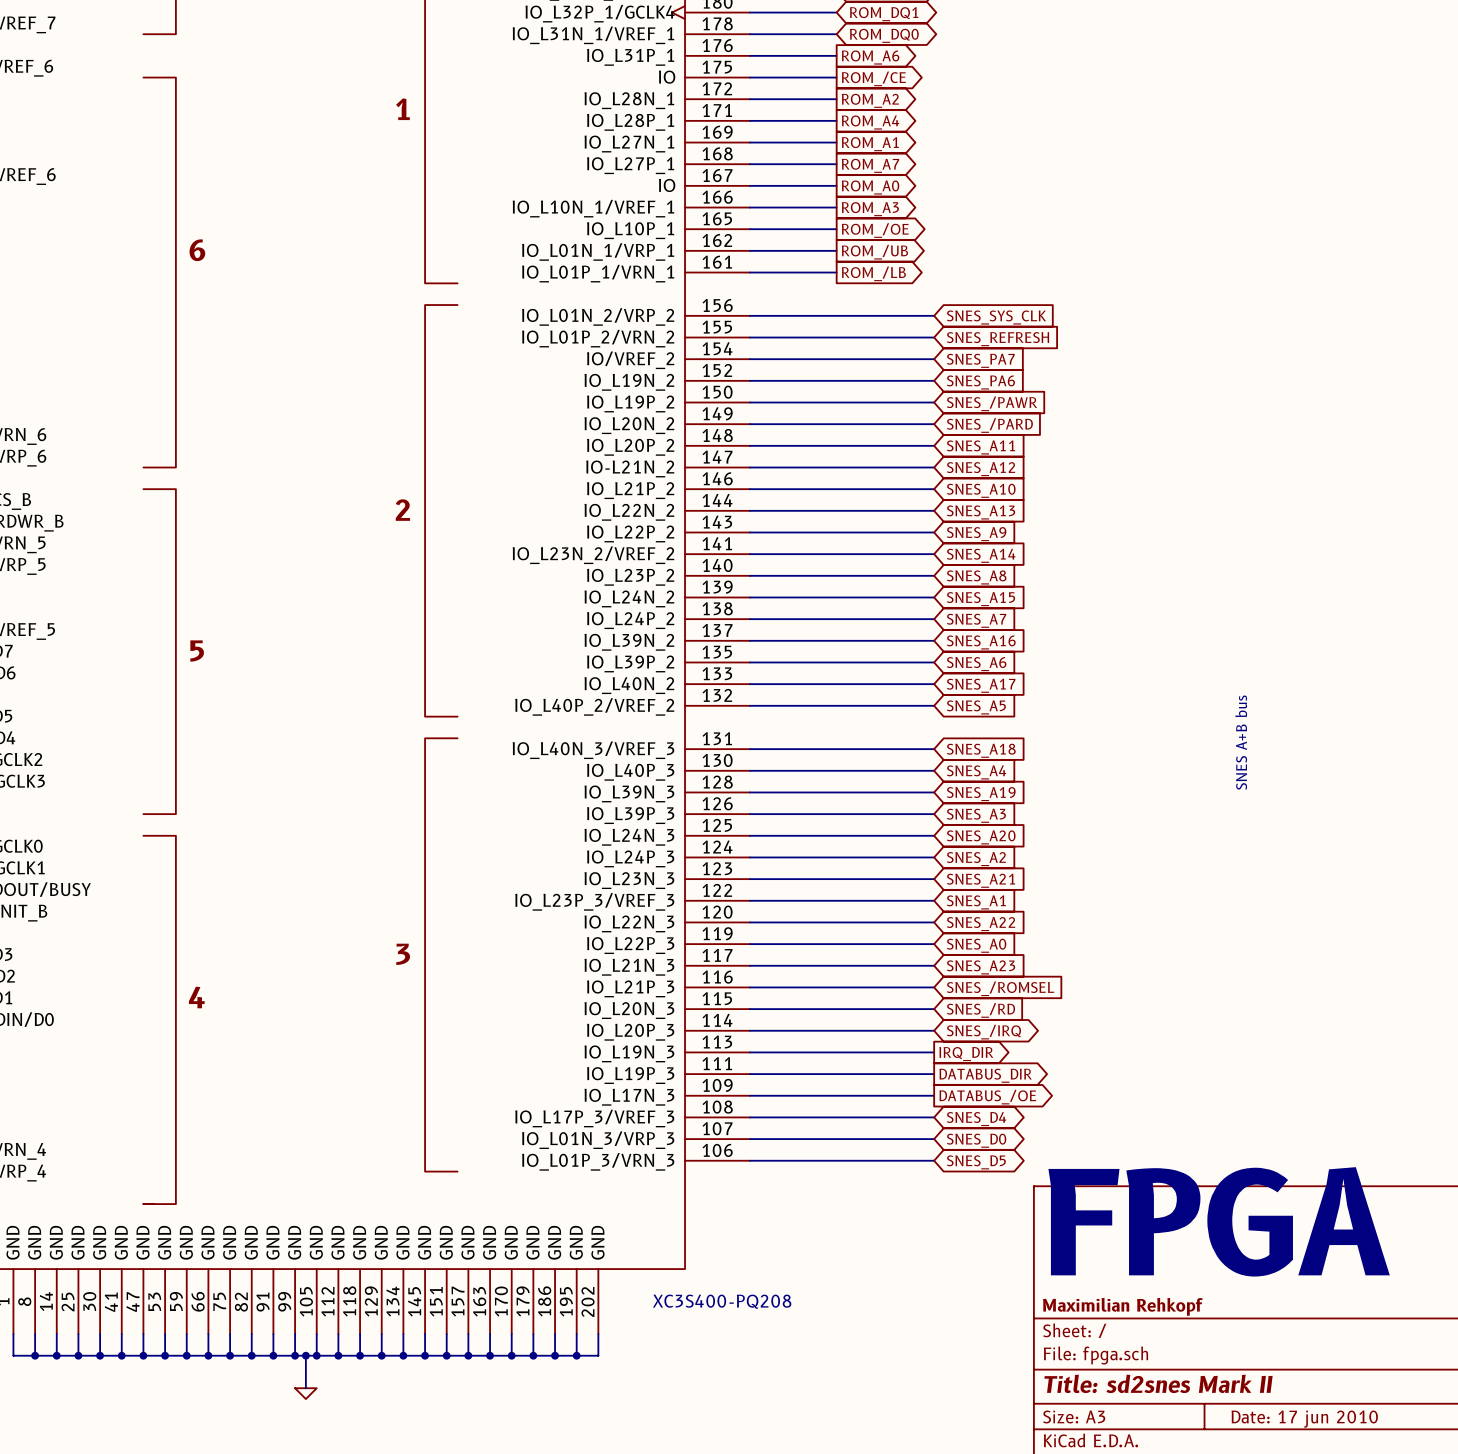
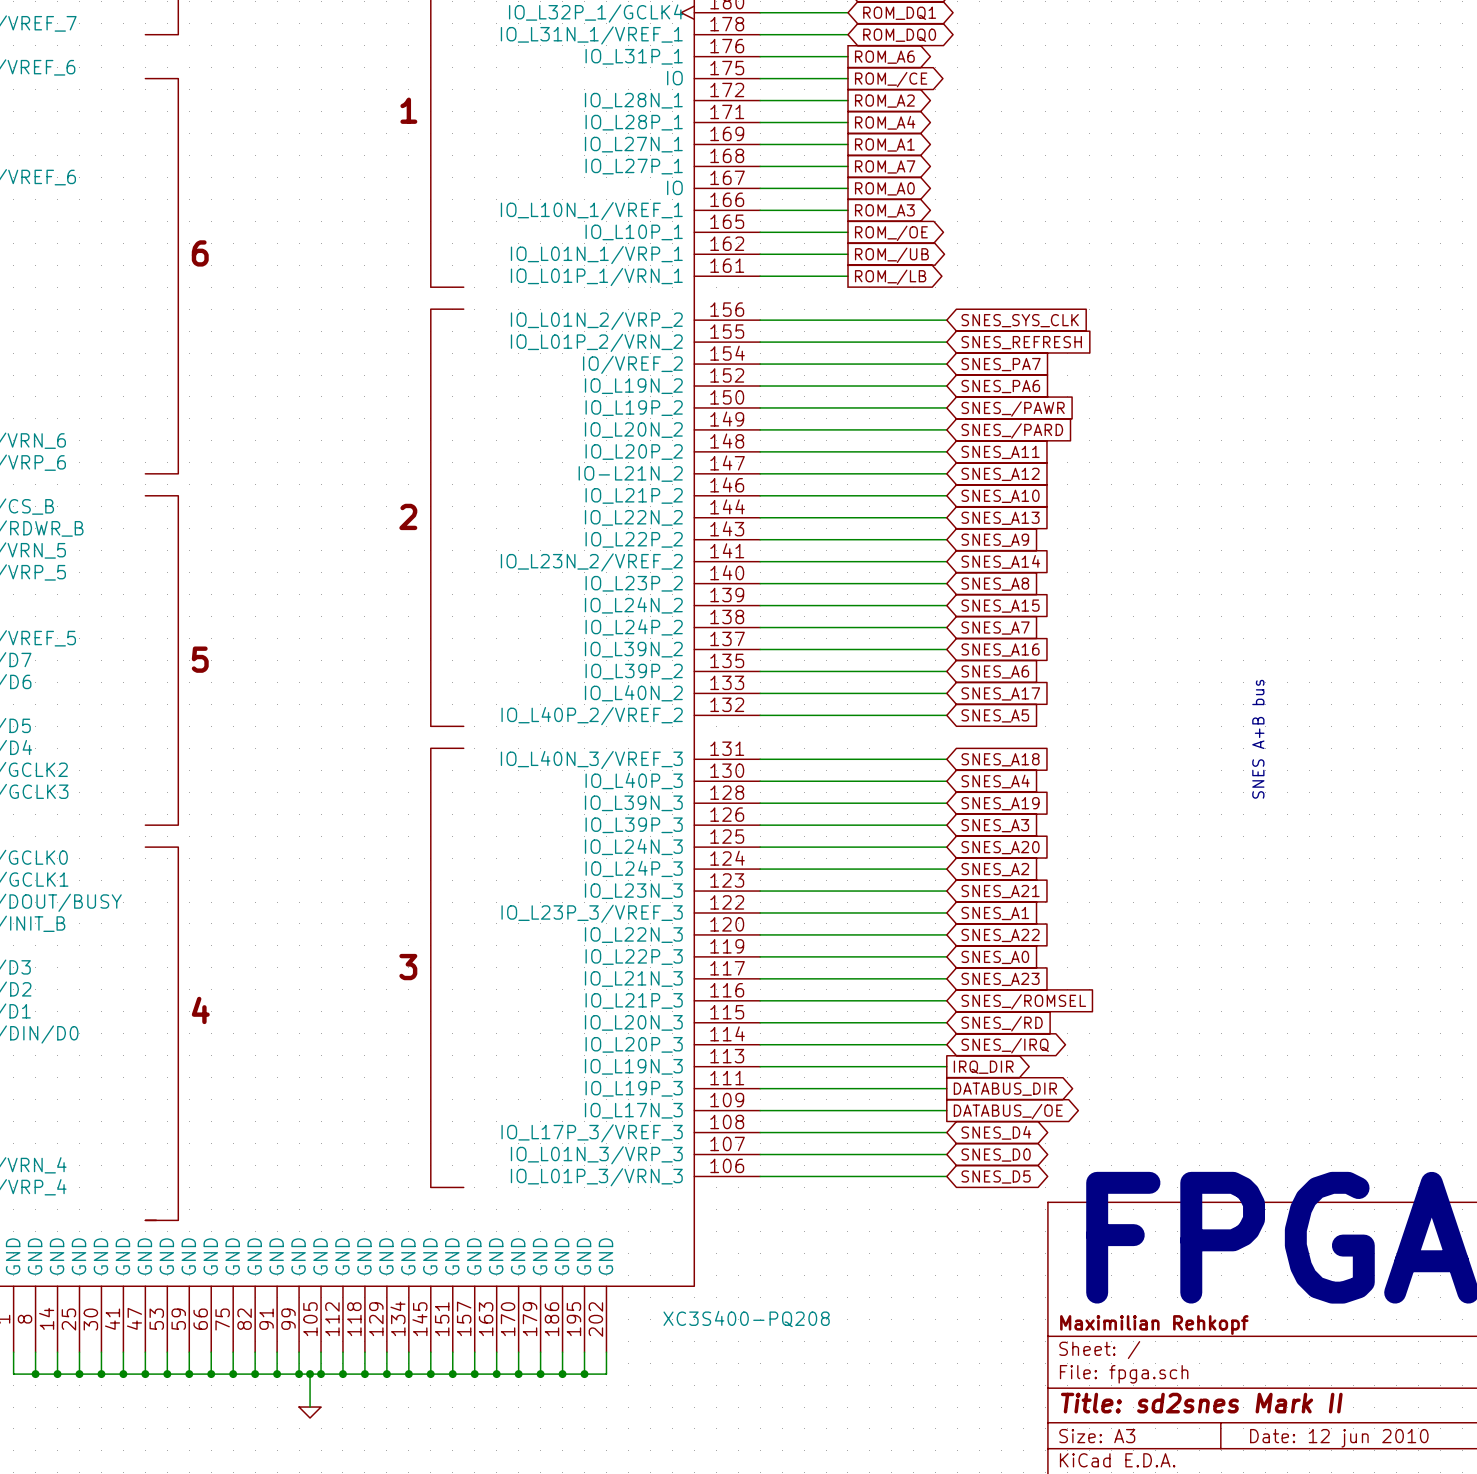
title block: Date: 17 jun 2010 (1304, 1419) -> Date: 12 jun 2010 (1339, 1438)

